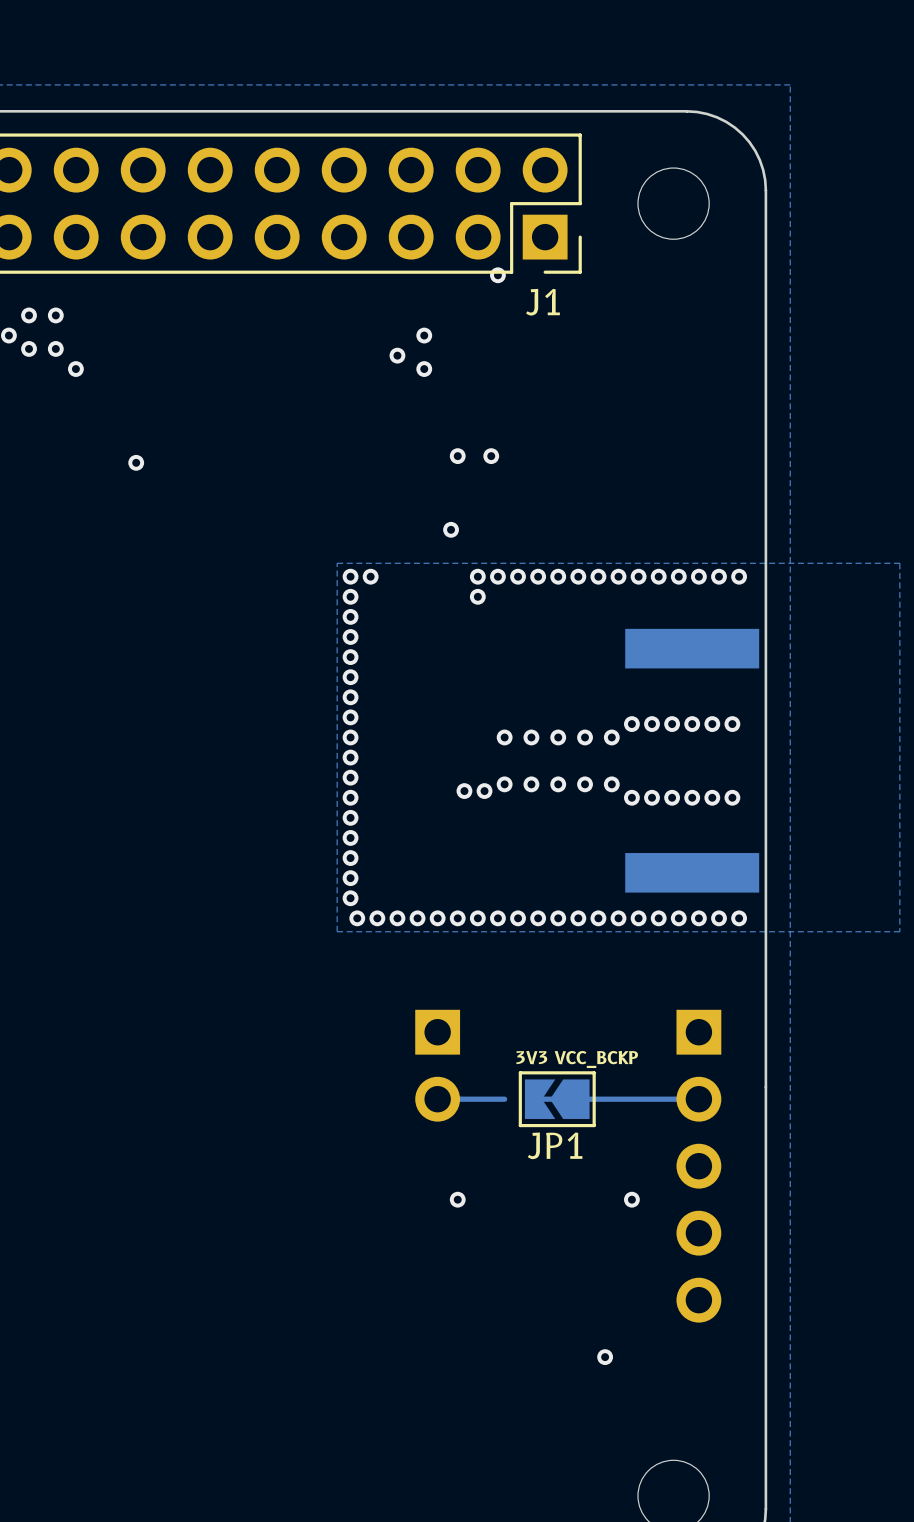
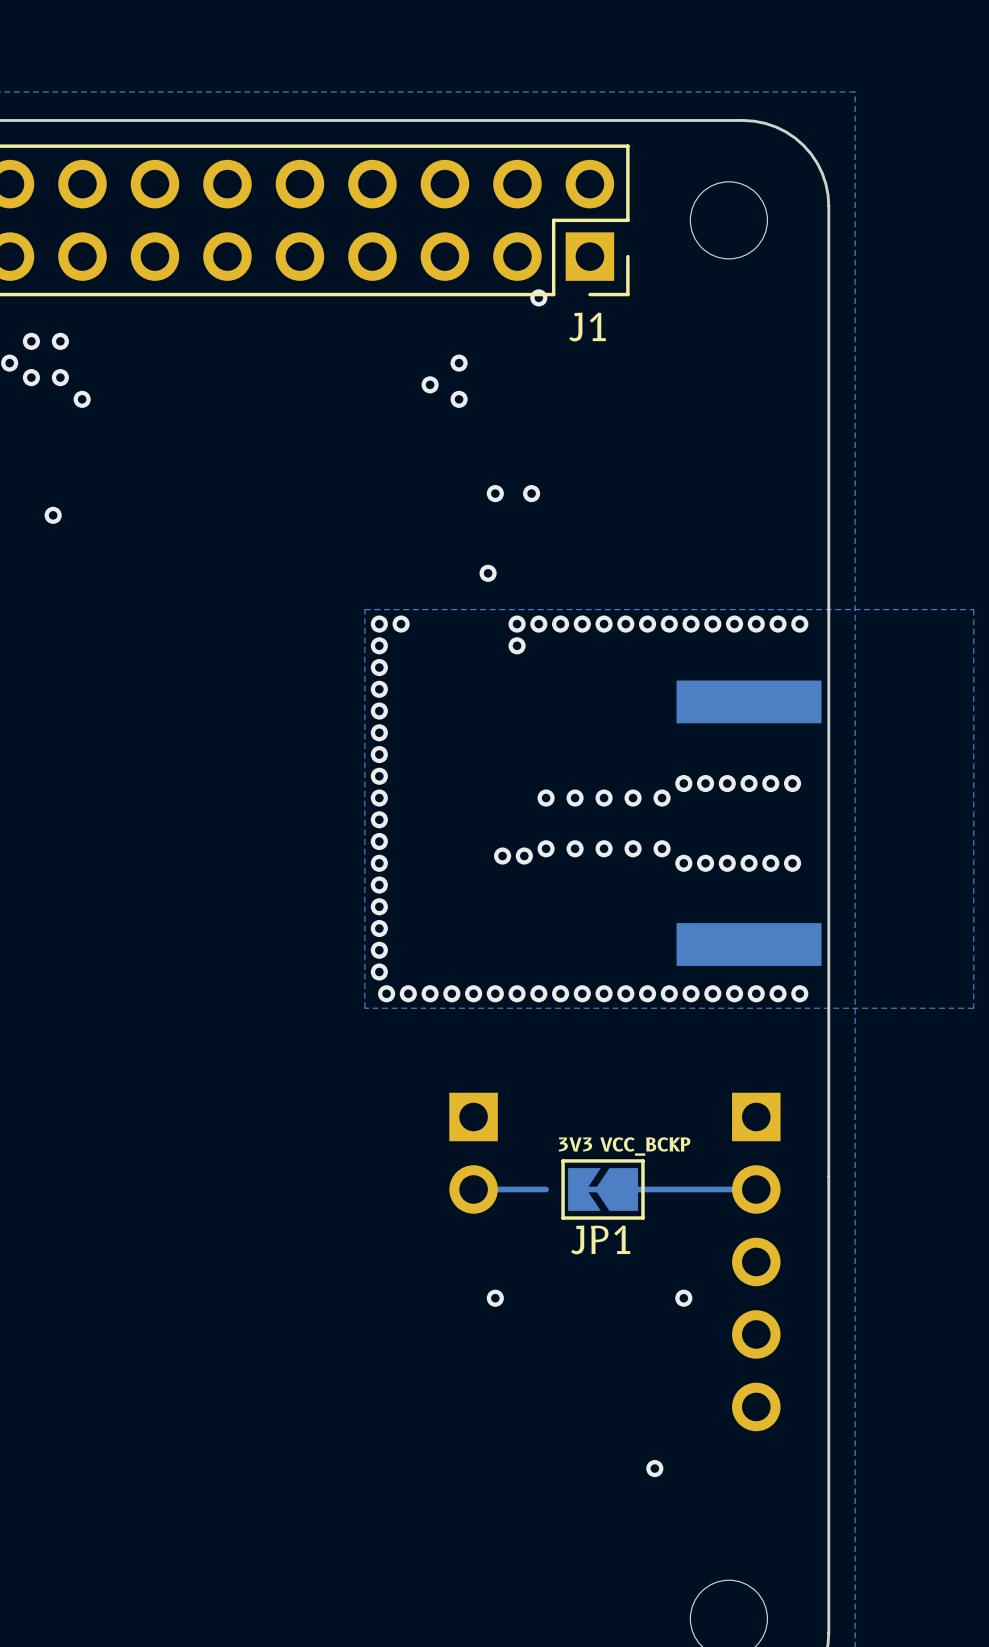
via position: (136, 462) -> (53, 515)

